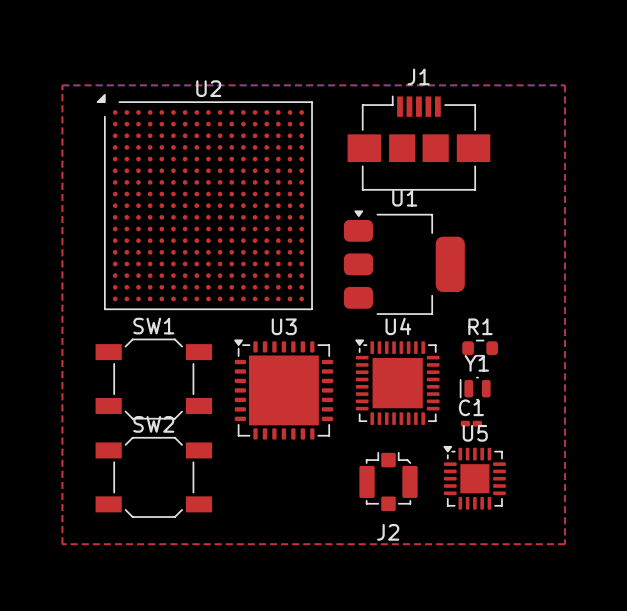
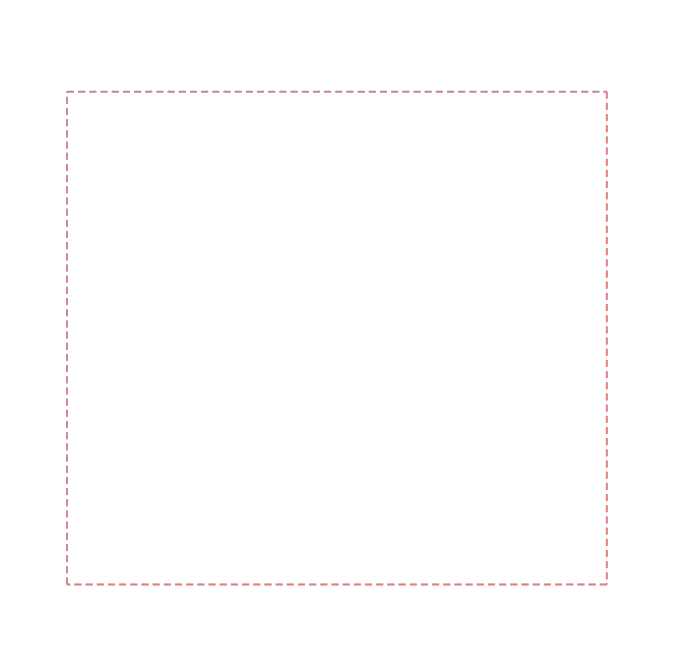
J1: (418, 143) -> none
U2: (204, 202) -> none
U1: (404, 262) -> none
R1: (480, 348) -> none
SW1: (153, 379) -> none
U4: (397, 382) -> none
Y1: (475, 388) -> none
U3: (283, 389) -> none
C1: (471, 423) -> none
SW2: (153, 477) -> none
U5: (474, 477) -> none
J2: (388, 481) -> none

